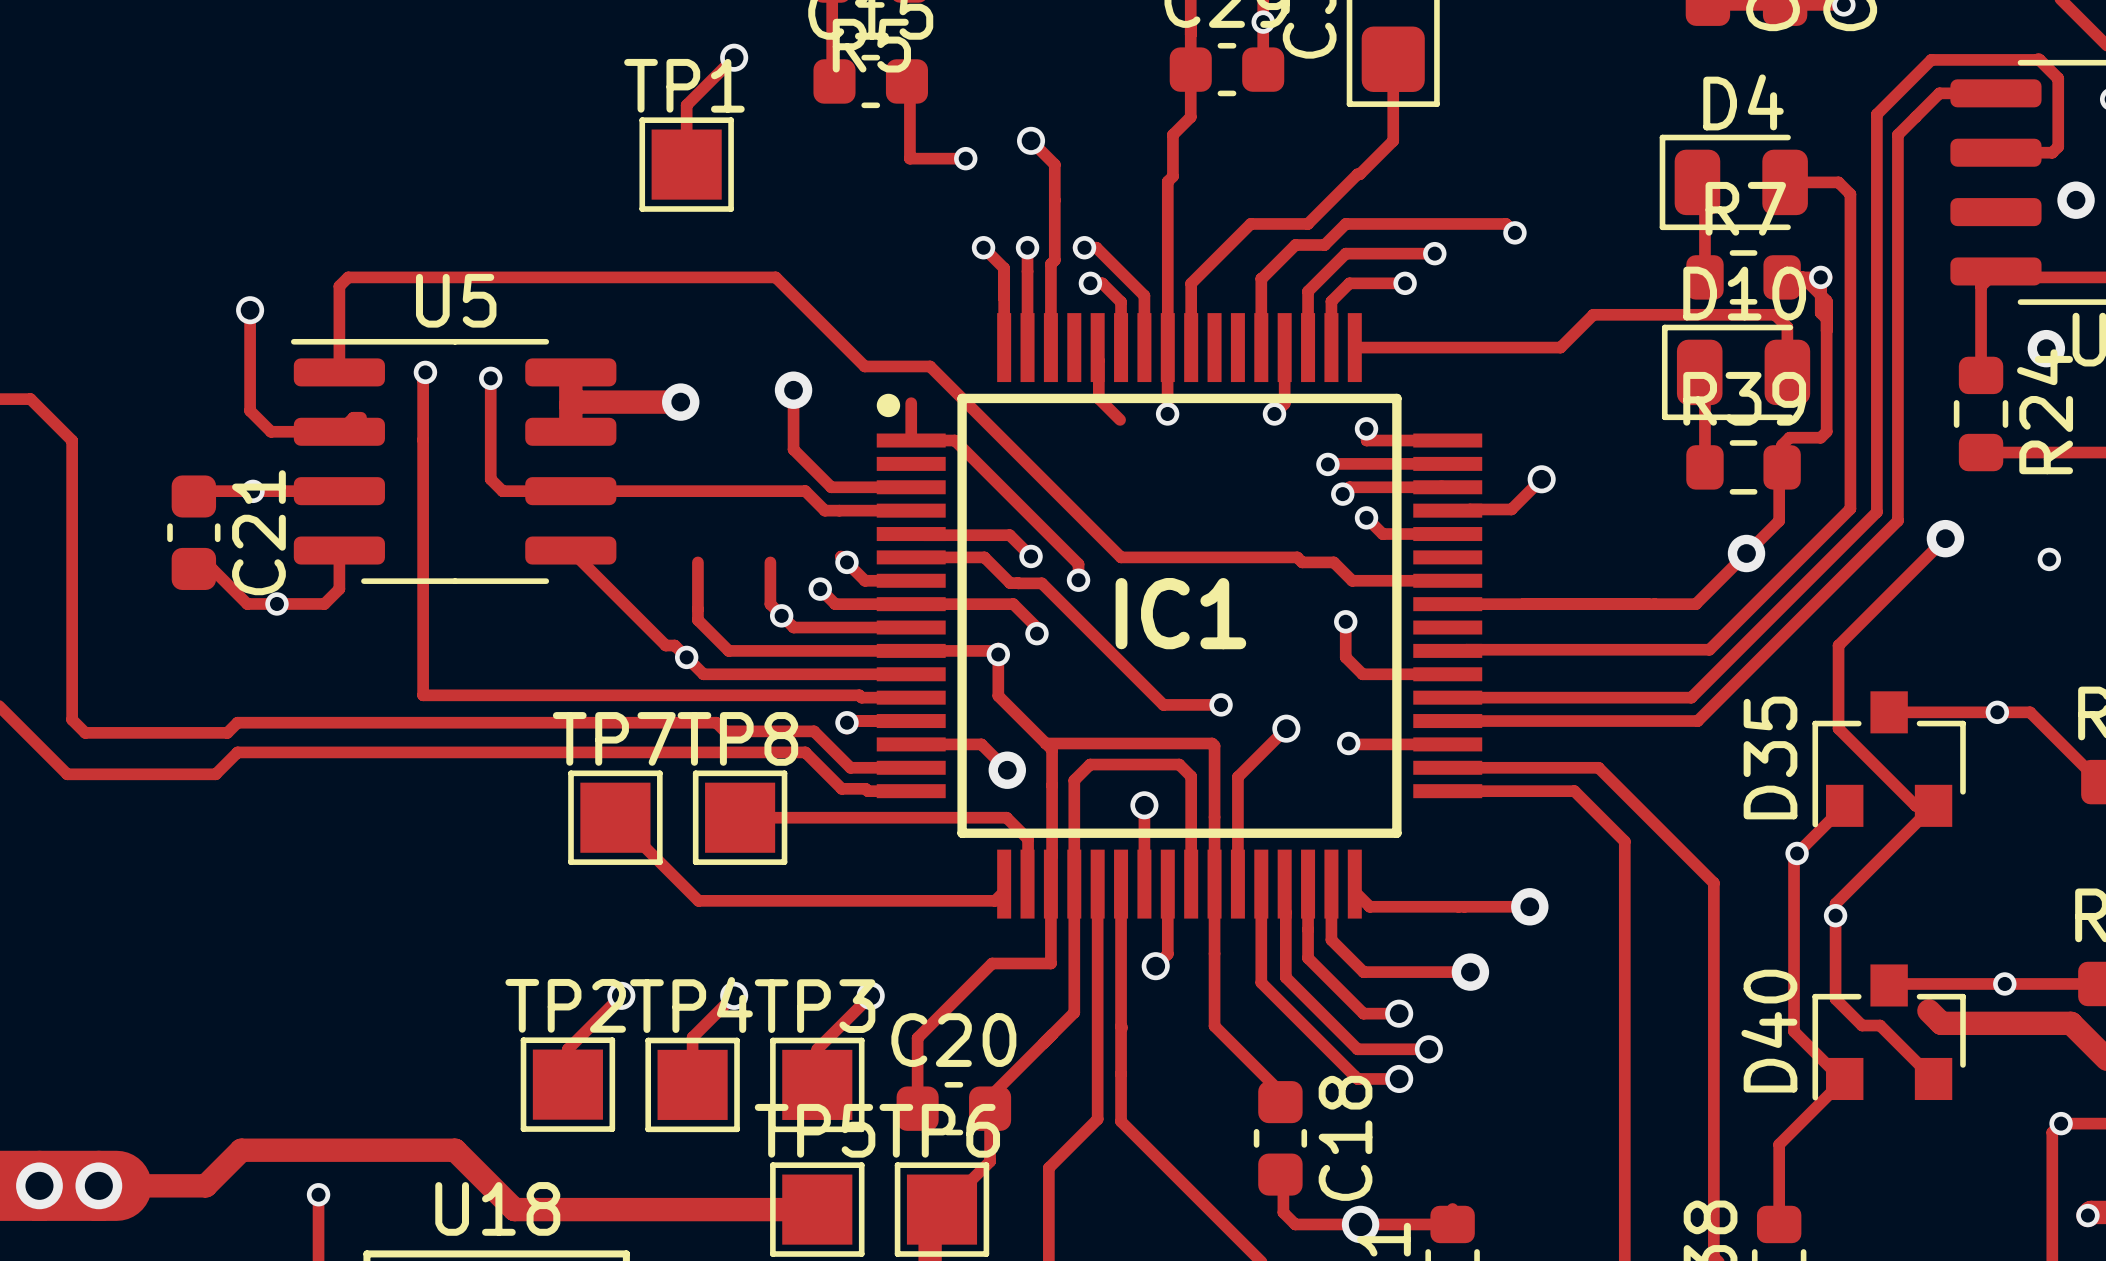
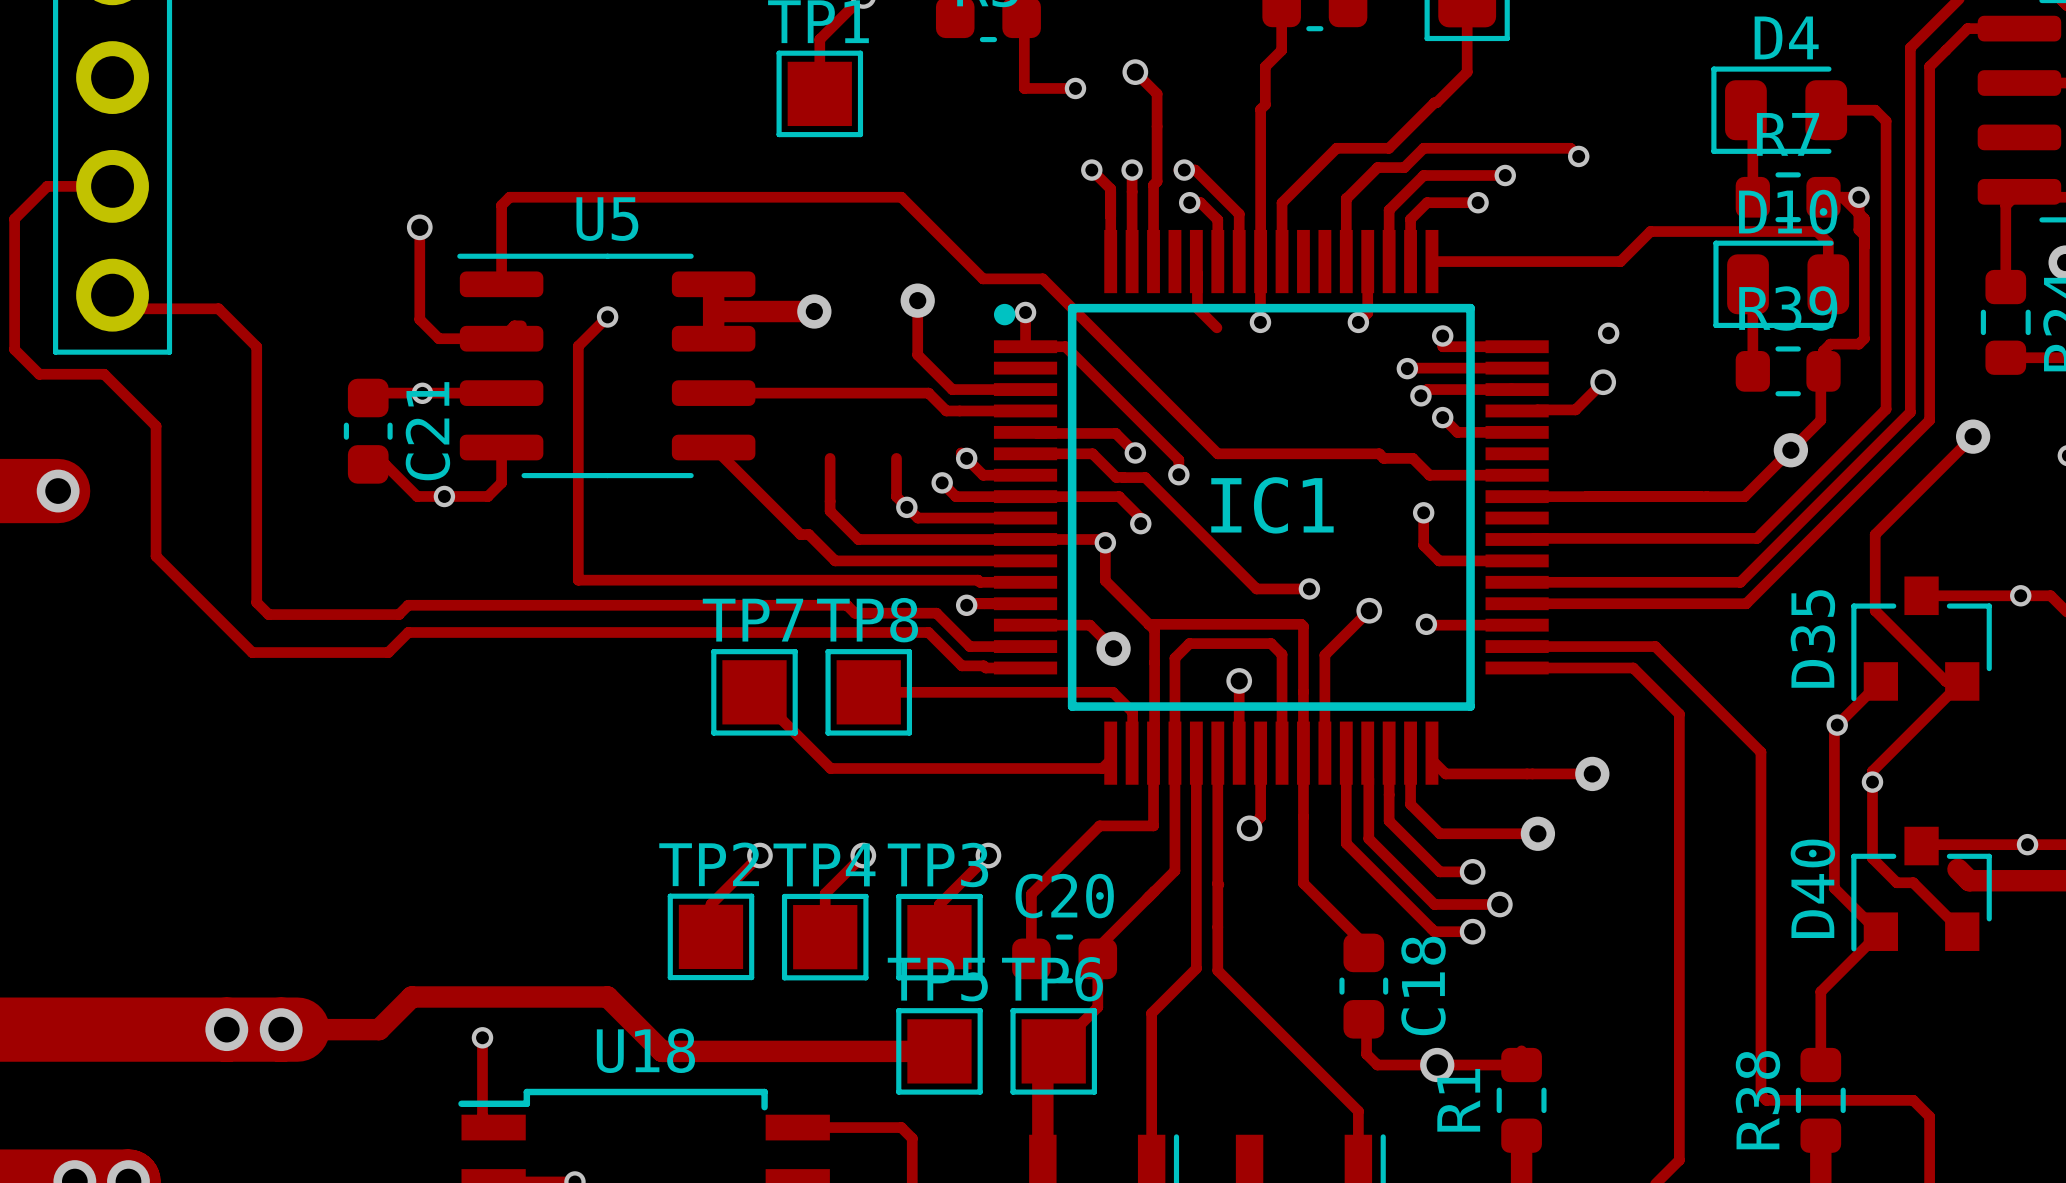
via: (425, 372) -> none
track: (431, 372) (423, 380) (423, 440) -> (607, 316) (578, 346)
track: (490, 378) (490, 479) (502, 491) (570, 491) -> none
via: (490, 378) -> none
via: none -> (1025, 312)
via: none -> (607, 316)
via: none -> (1608, 333)
via: (686, 657) -> none

